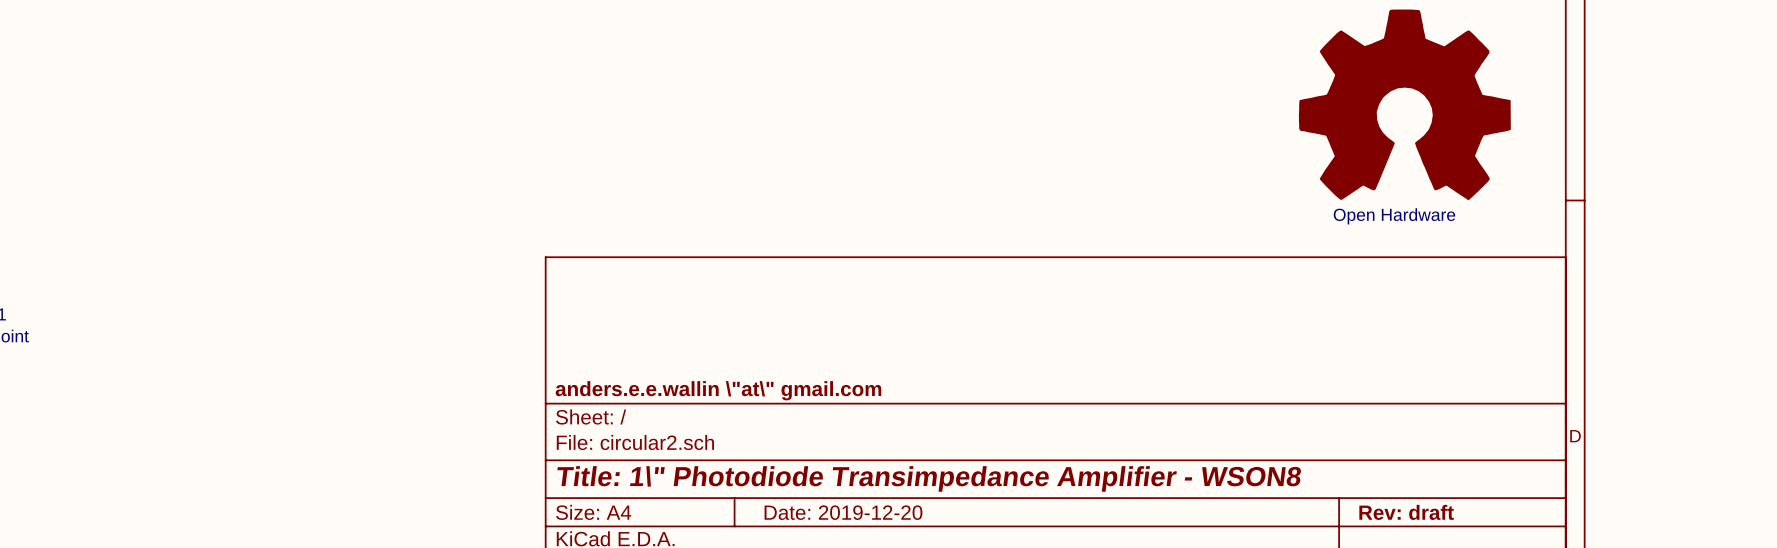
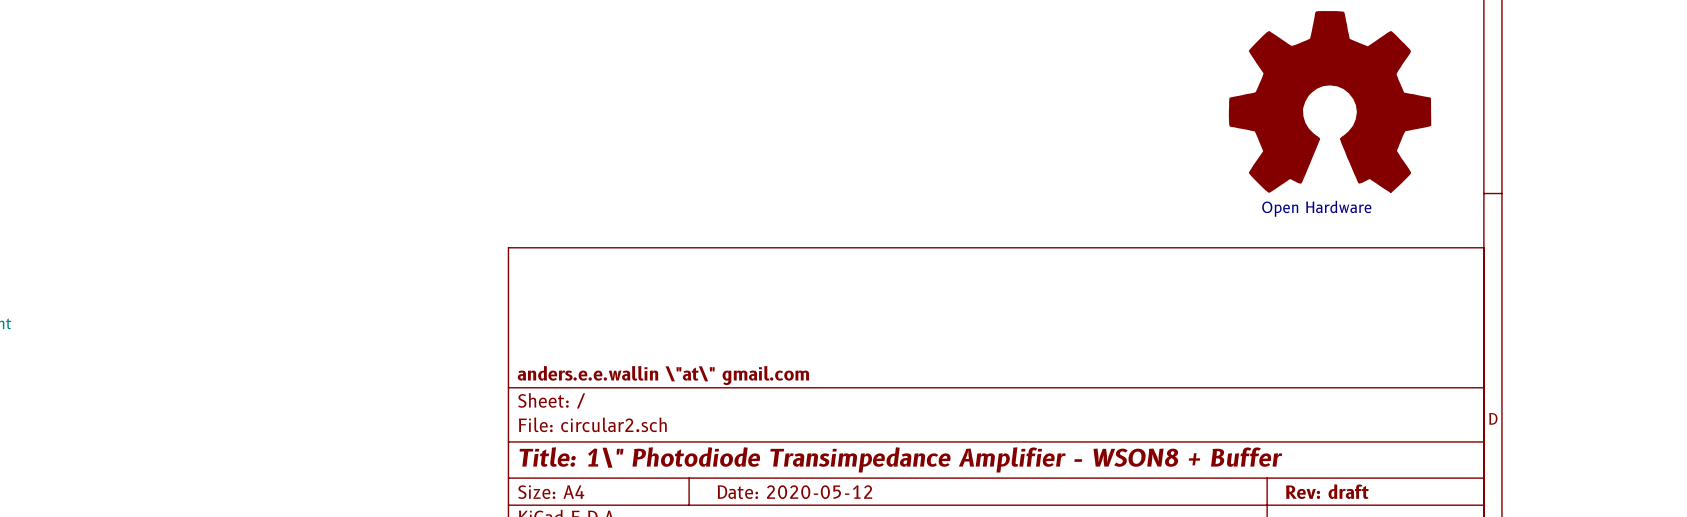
title block: Title: 1\" Photodiode Transimpedance Amplifier - WSON8 (929, 478) -> Title: 1\" Photodiode Transimpedance Amplifier - WSON8 + Buffer (900, 459)
title block: Date: 2019-12-20 (843, 512) -> Date: 2020-05-12 (794, 492)

